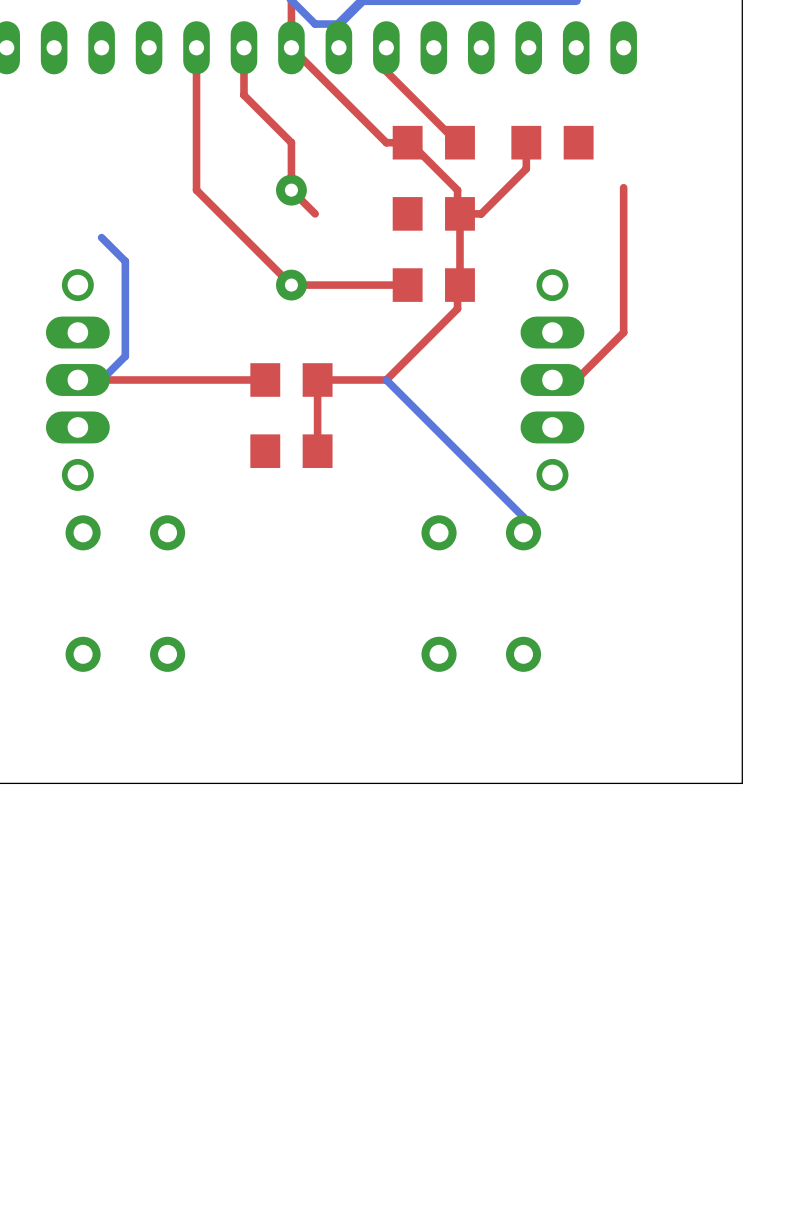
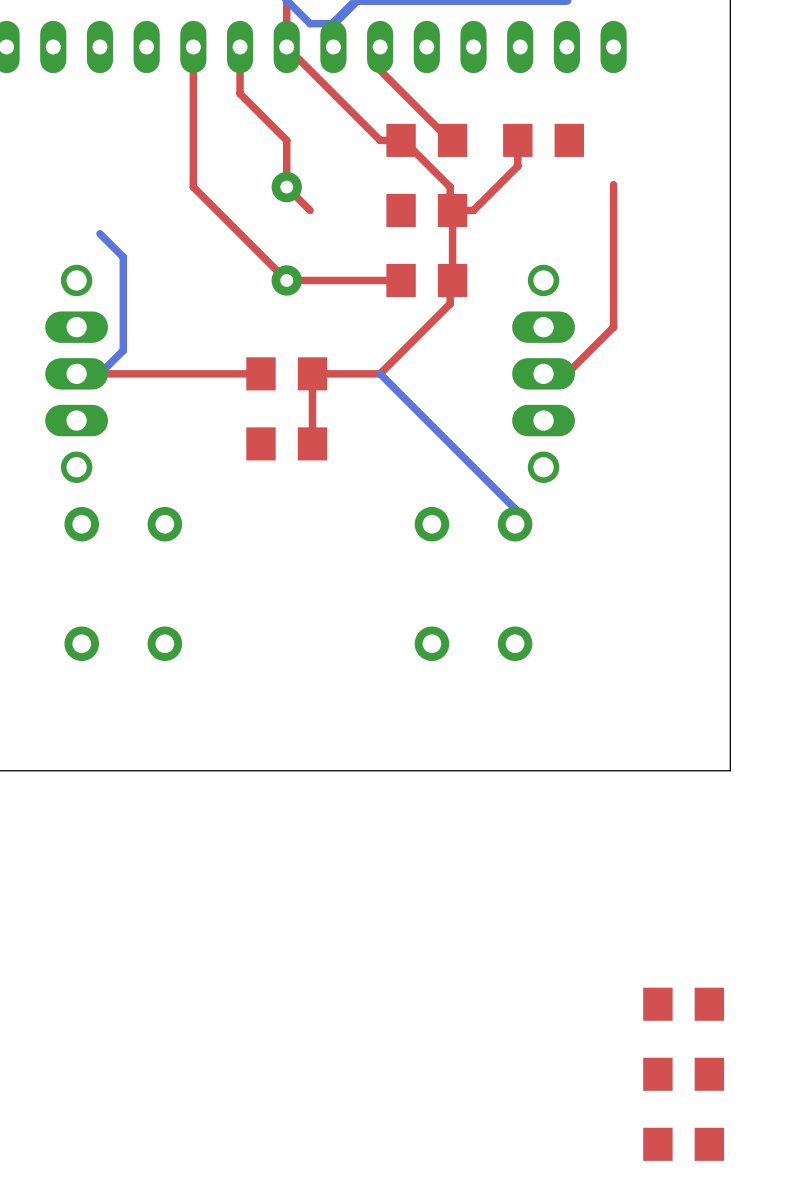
part: none -> (683, 1004)
part: none -> (683, 1074)
part: none -> (683, 1144)

